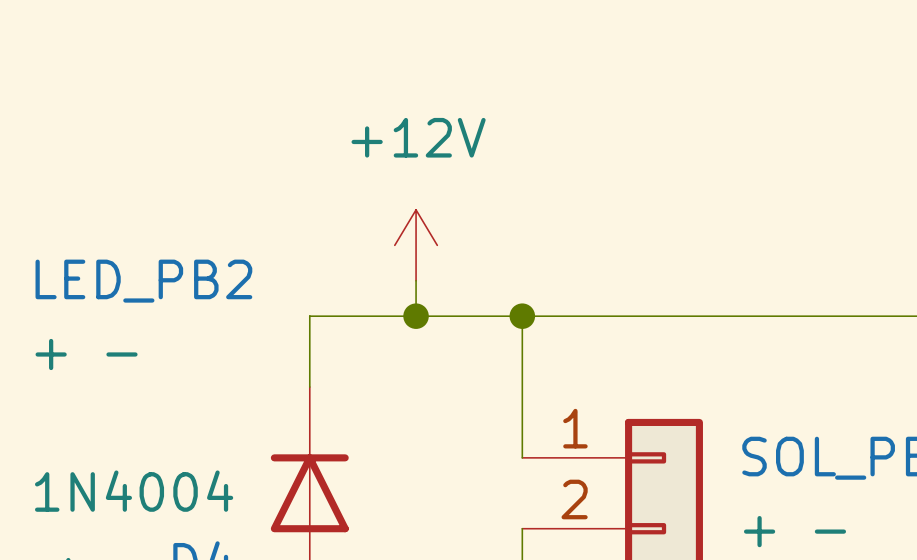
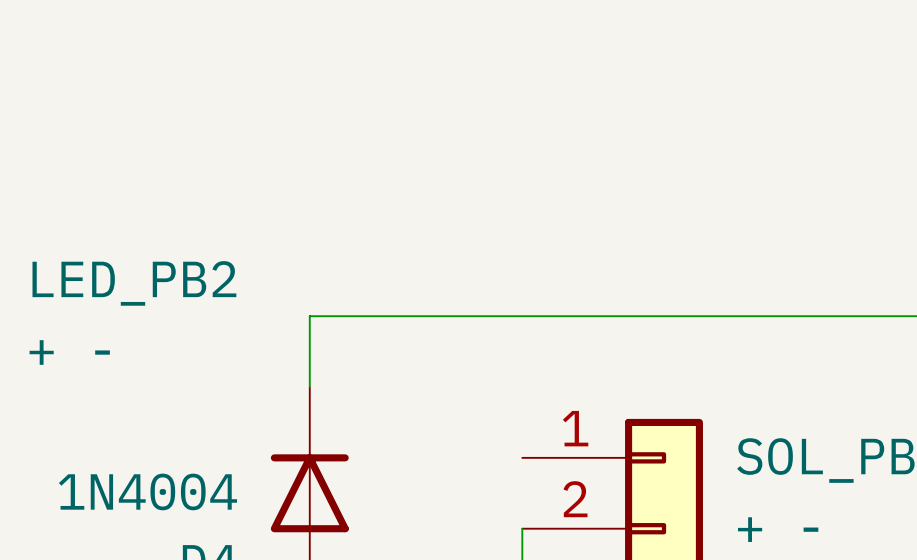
power symbol: +12V (416, 245) -> none
wire: (416, 280) (416, 316) -> none
junction: (416, 316) -> none
wire: (522, 316) (522, 457) -> none
junction: (522, 316) -> none

